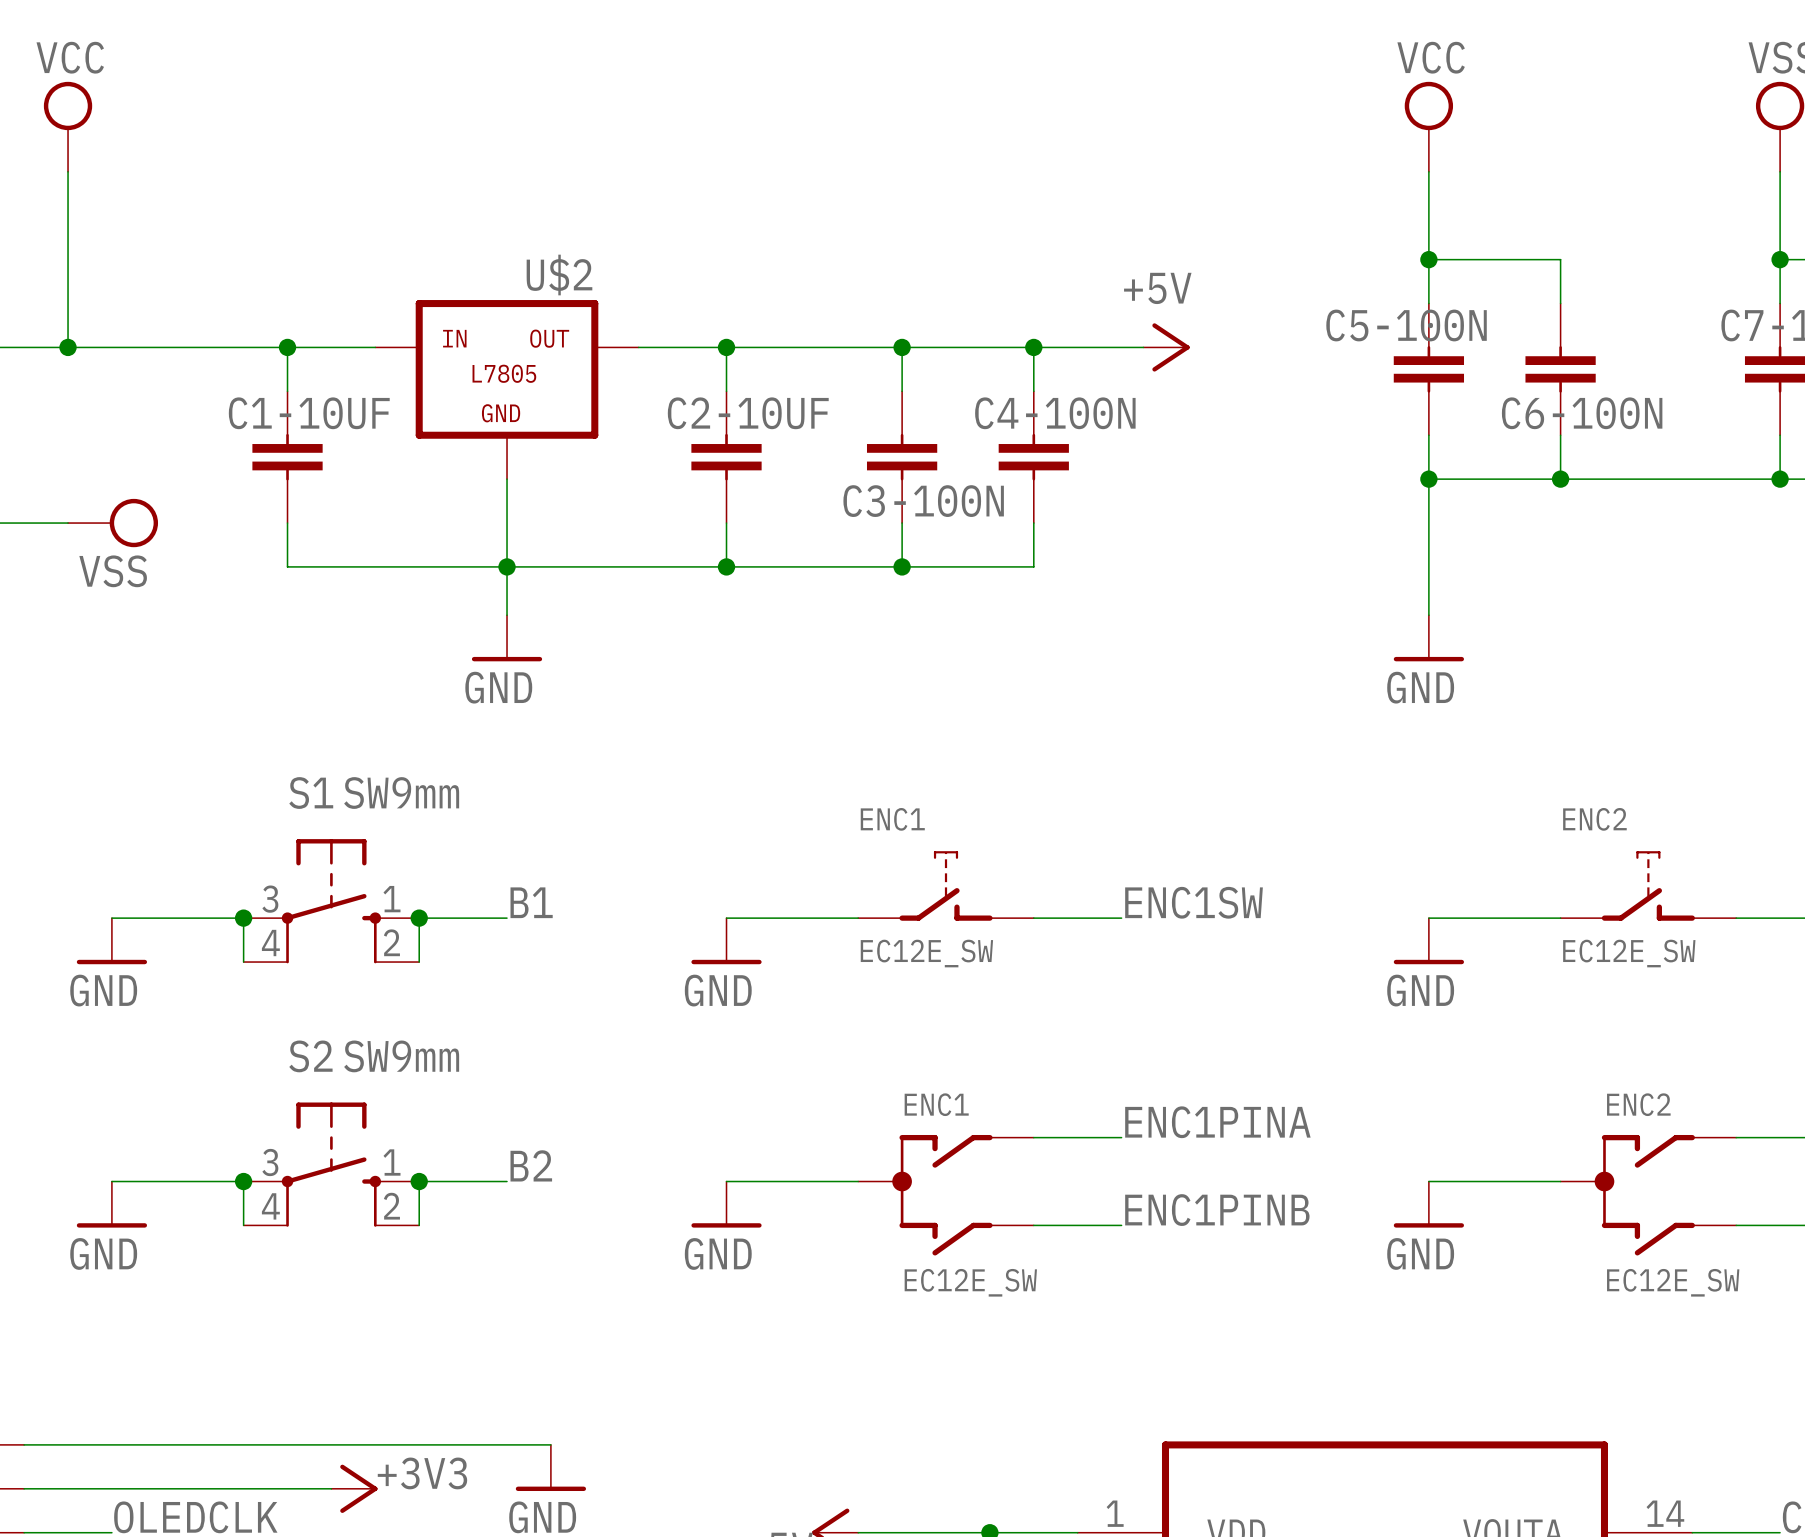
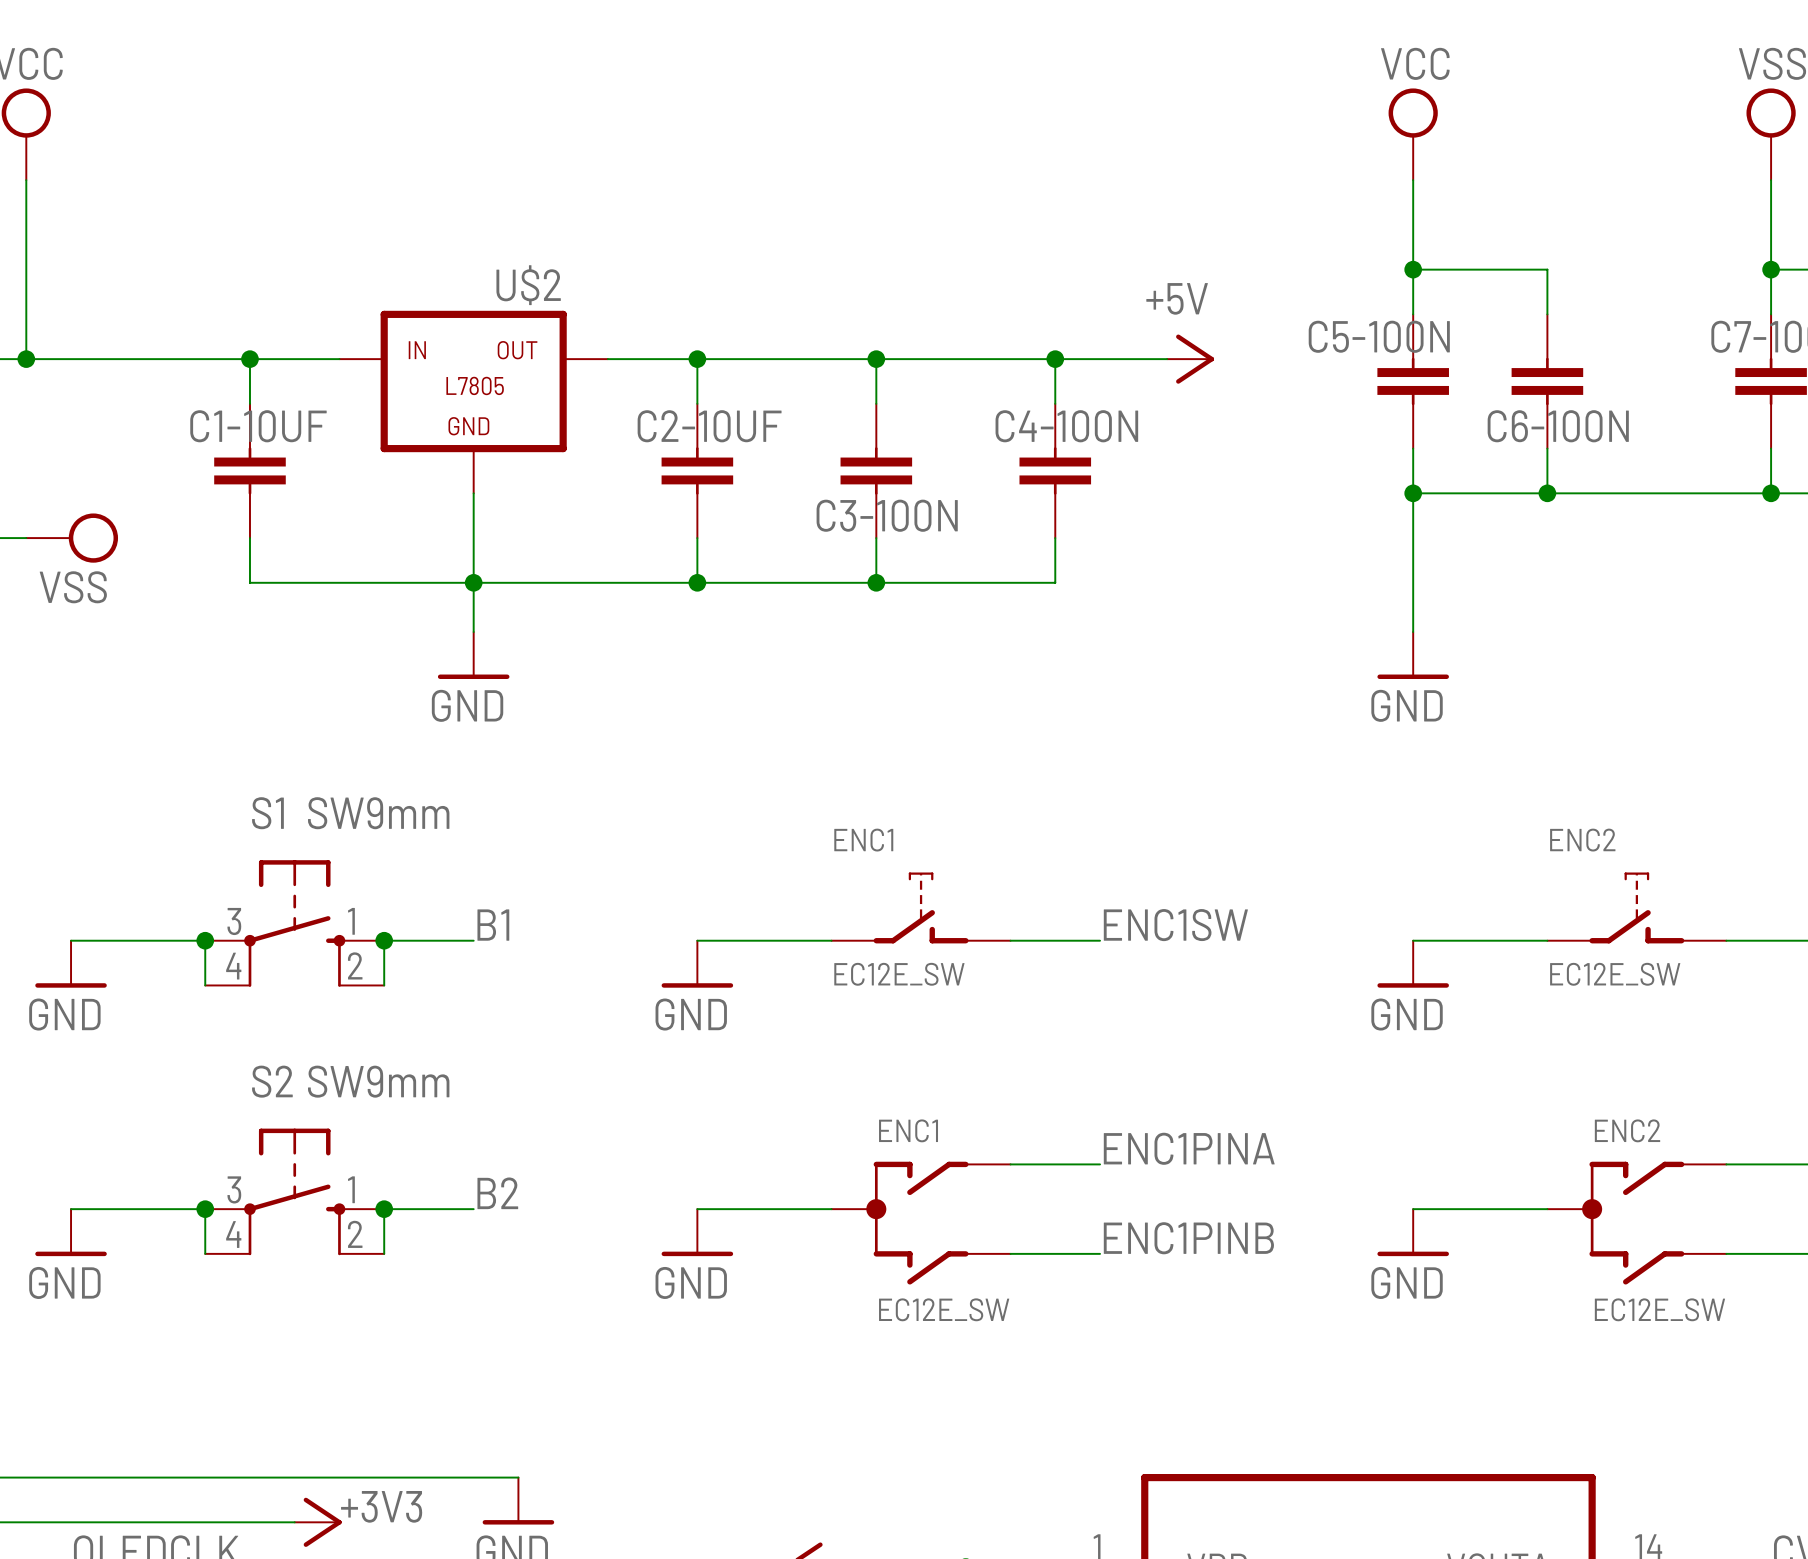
wire: (1033, 347) (1033, 391) -> (1055, 359) (1055, 403)
junction position: (1033, 347) -> (1055, 359)
power symbol position: +5V (1166, 347) -> +5V (1190, 359)
C4-100N position: (1033, 457) -> (1055, 470)
wire: (1033, 523) (1033, 566) -> (1055, 538) (1055, 582) (1010, 582)

